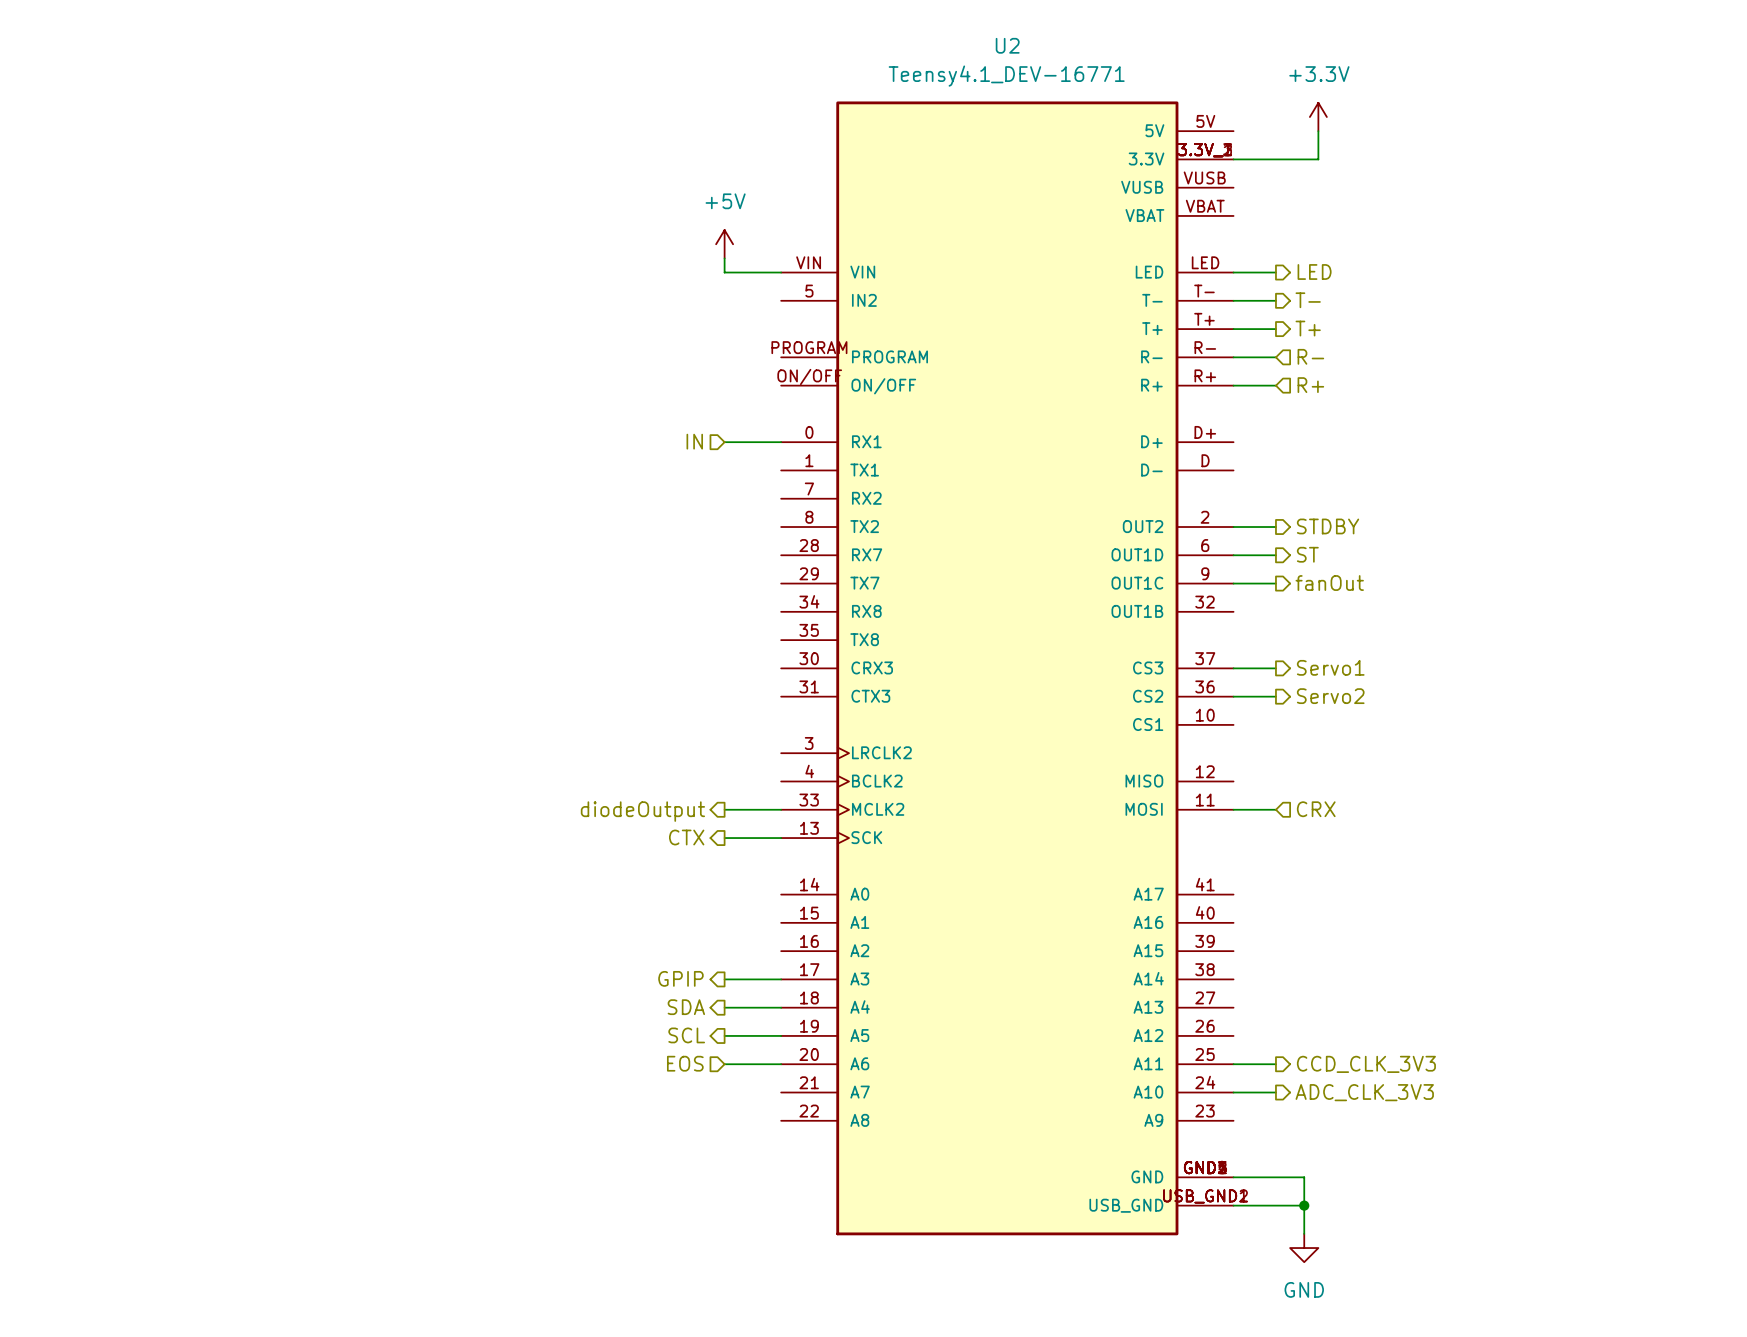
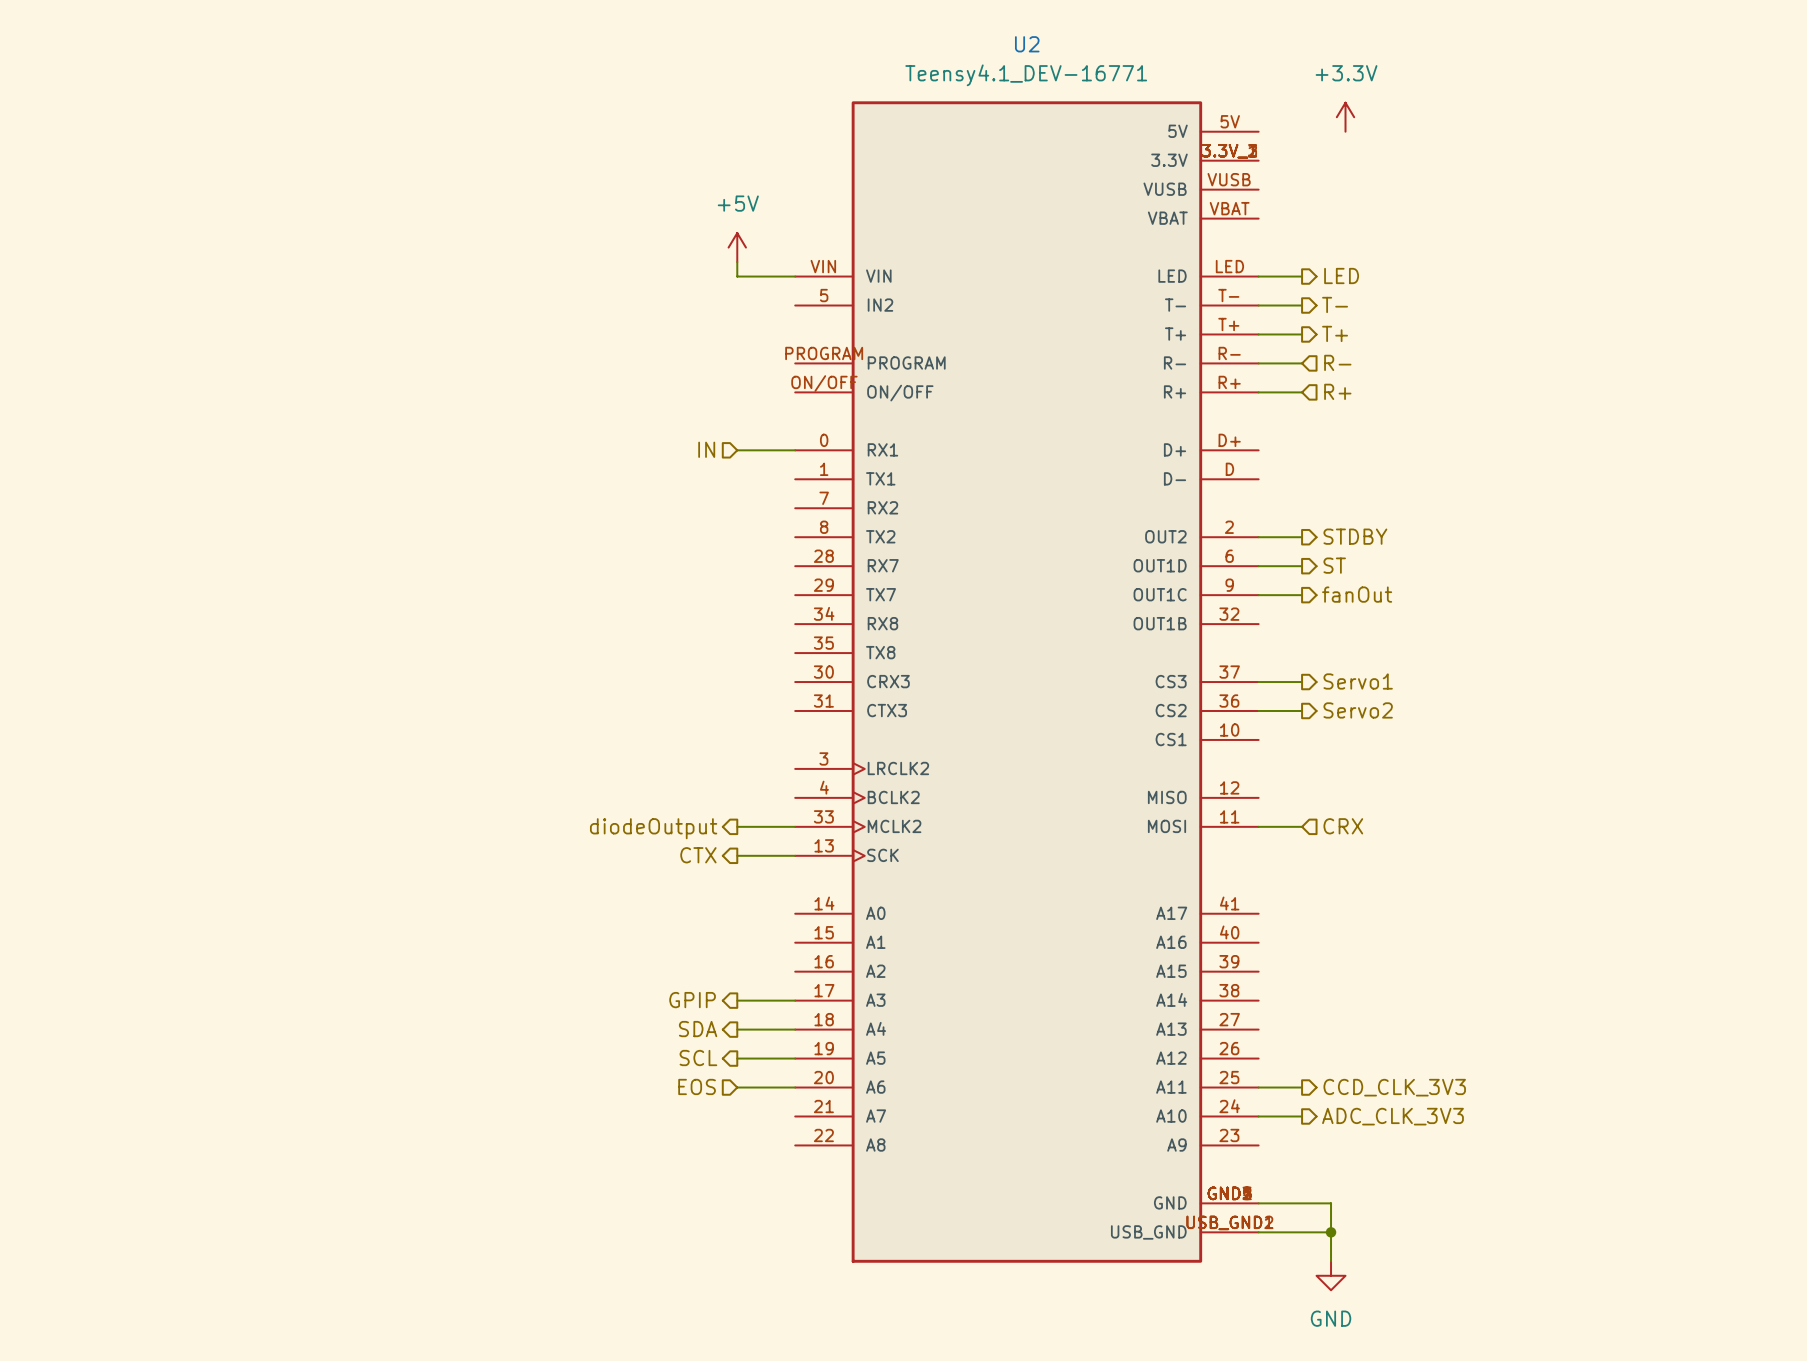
wire: (1318, 131) (1318, 159) (1233, 159) -> none

